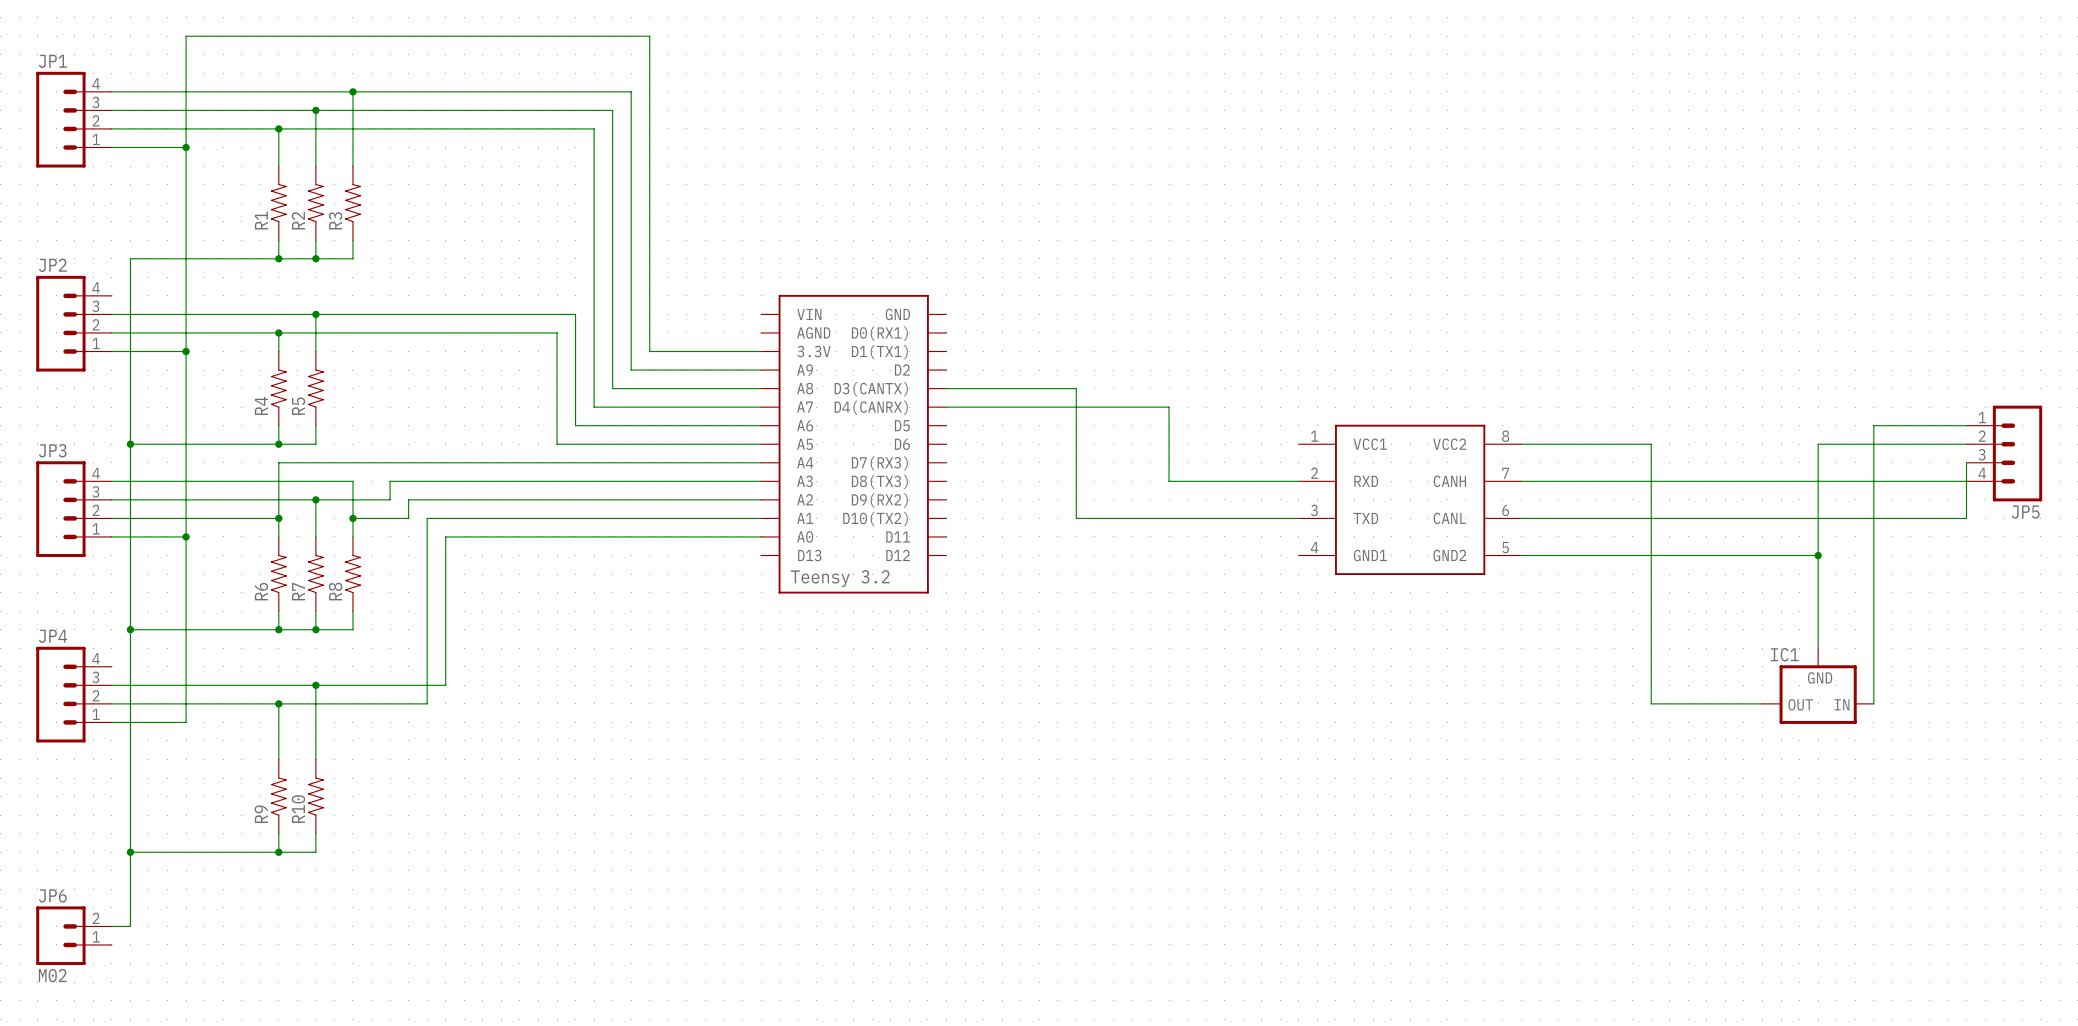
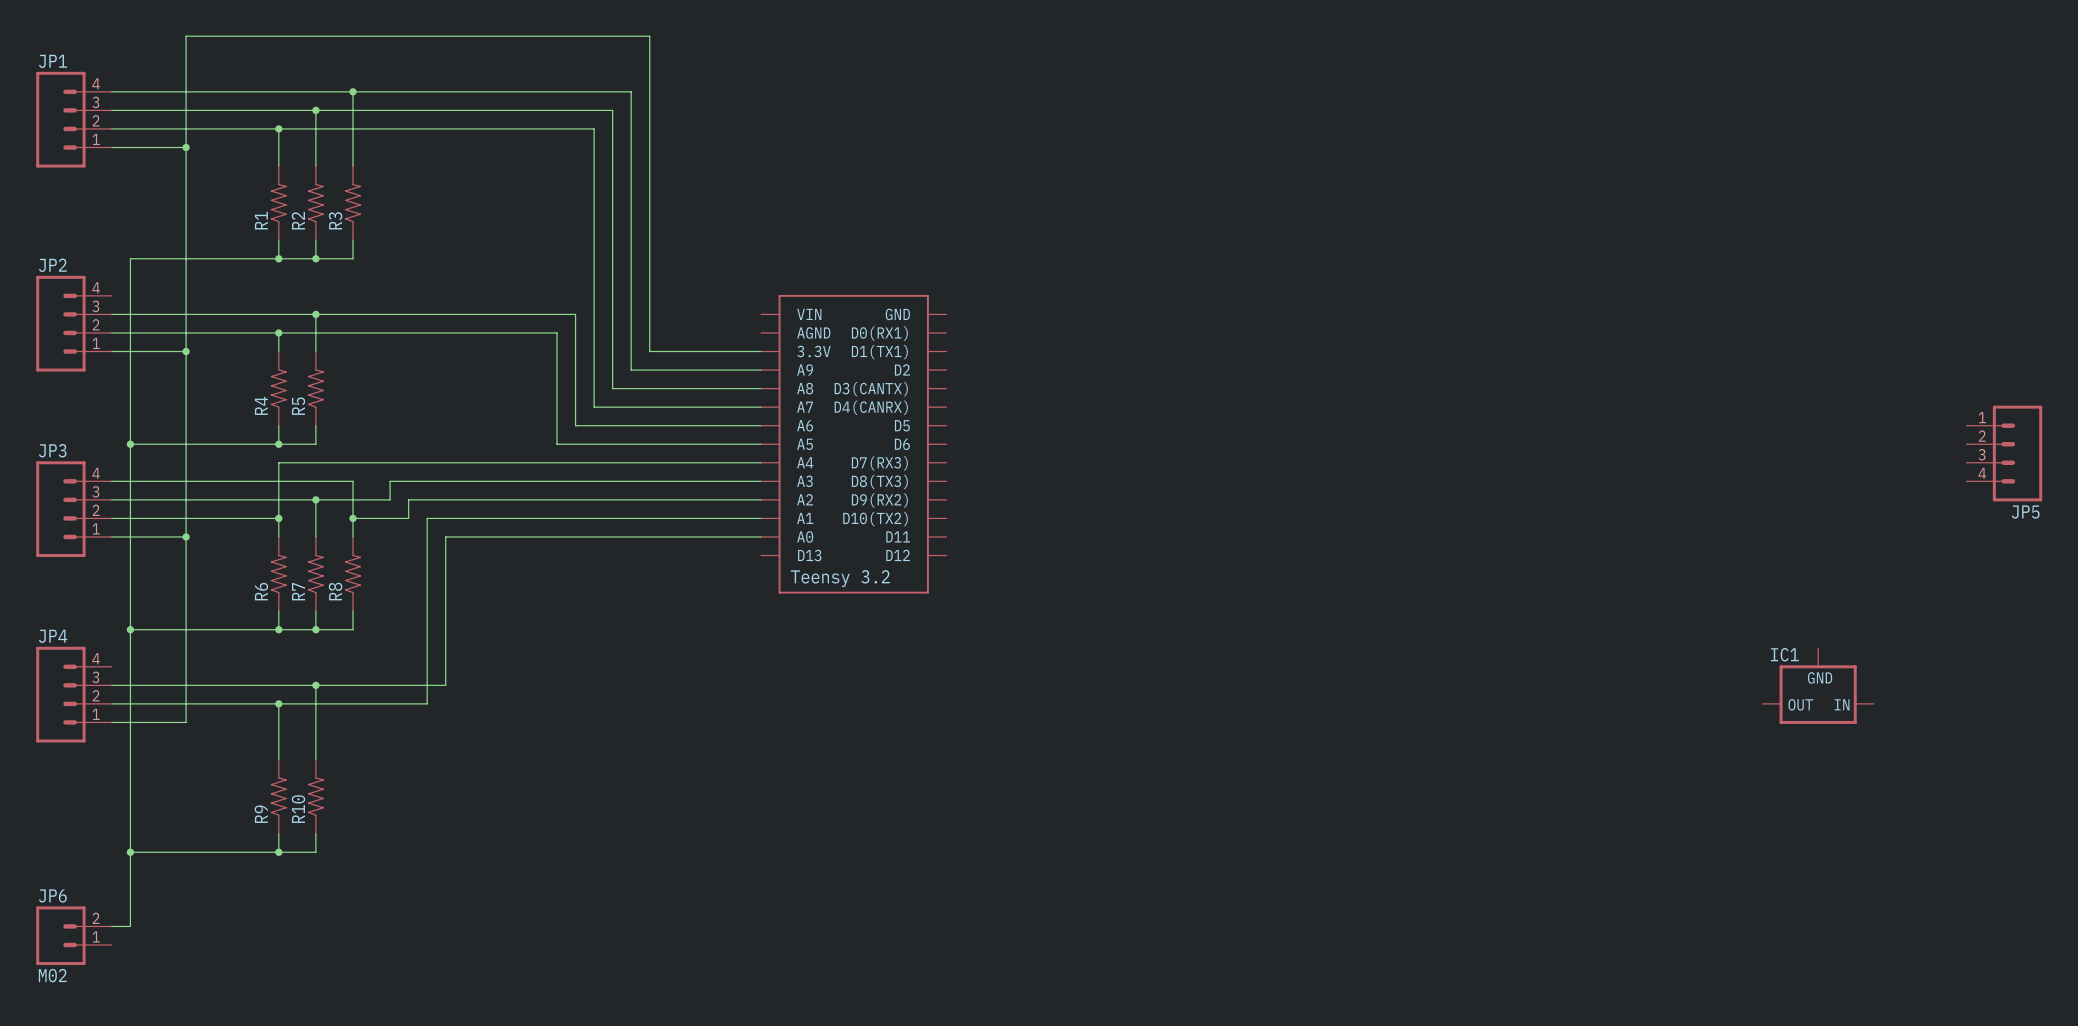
wire: (946, 388) (1076, 388) (1076, 518) (1298, 518) -> none
wire: (946, 407) (1169, 407) (1169, 481) (1298, 481) -> none
wire: (1966, 425) (1873, 425) (1873, 703) -> none
wire: (1521, 444) (1651, 444) (1651, 703) (1762, 703) -> none
wire: (1966, 444) (1818, 444) (1818, 648) -> none
wire: (1966, 462) (1966, 518) (1521, 518) -> none
wire: (1521, 481) (1966, 481) -> none
part: (1410, 499) -> none
wire: (1521, 555) (1818, 555) -> none
junction: (1818, 555) -> none

